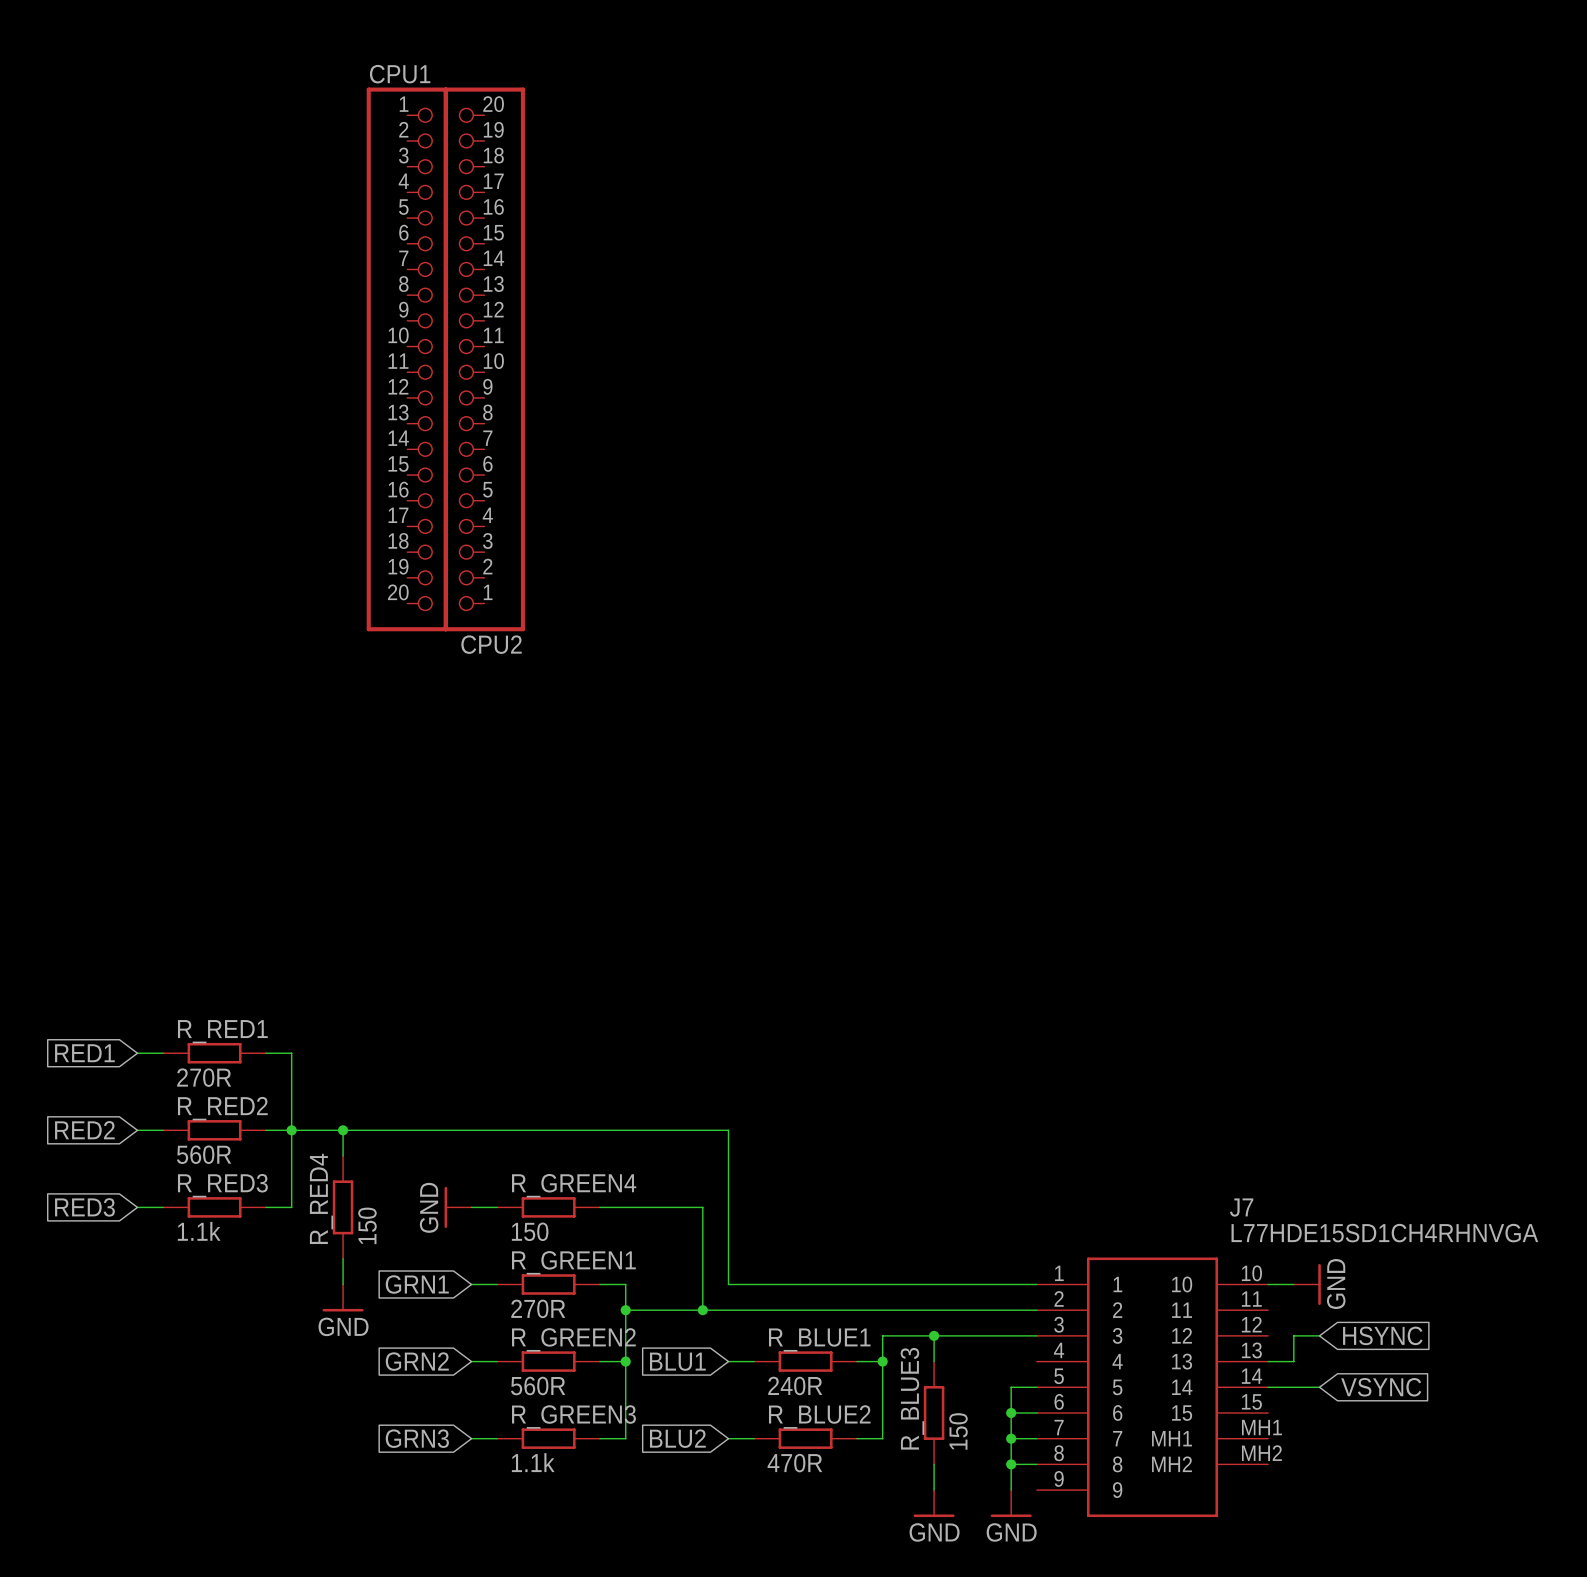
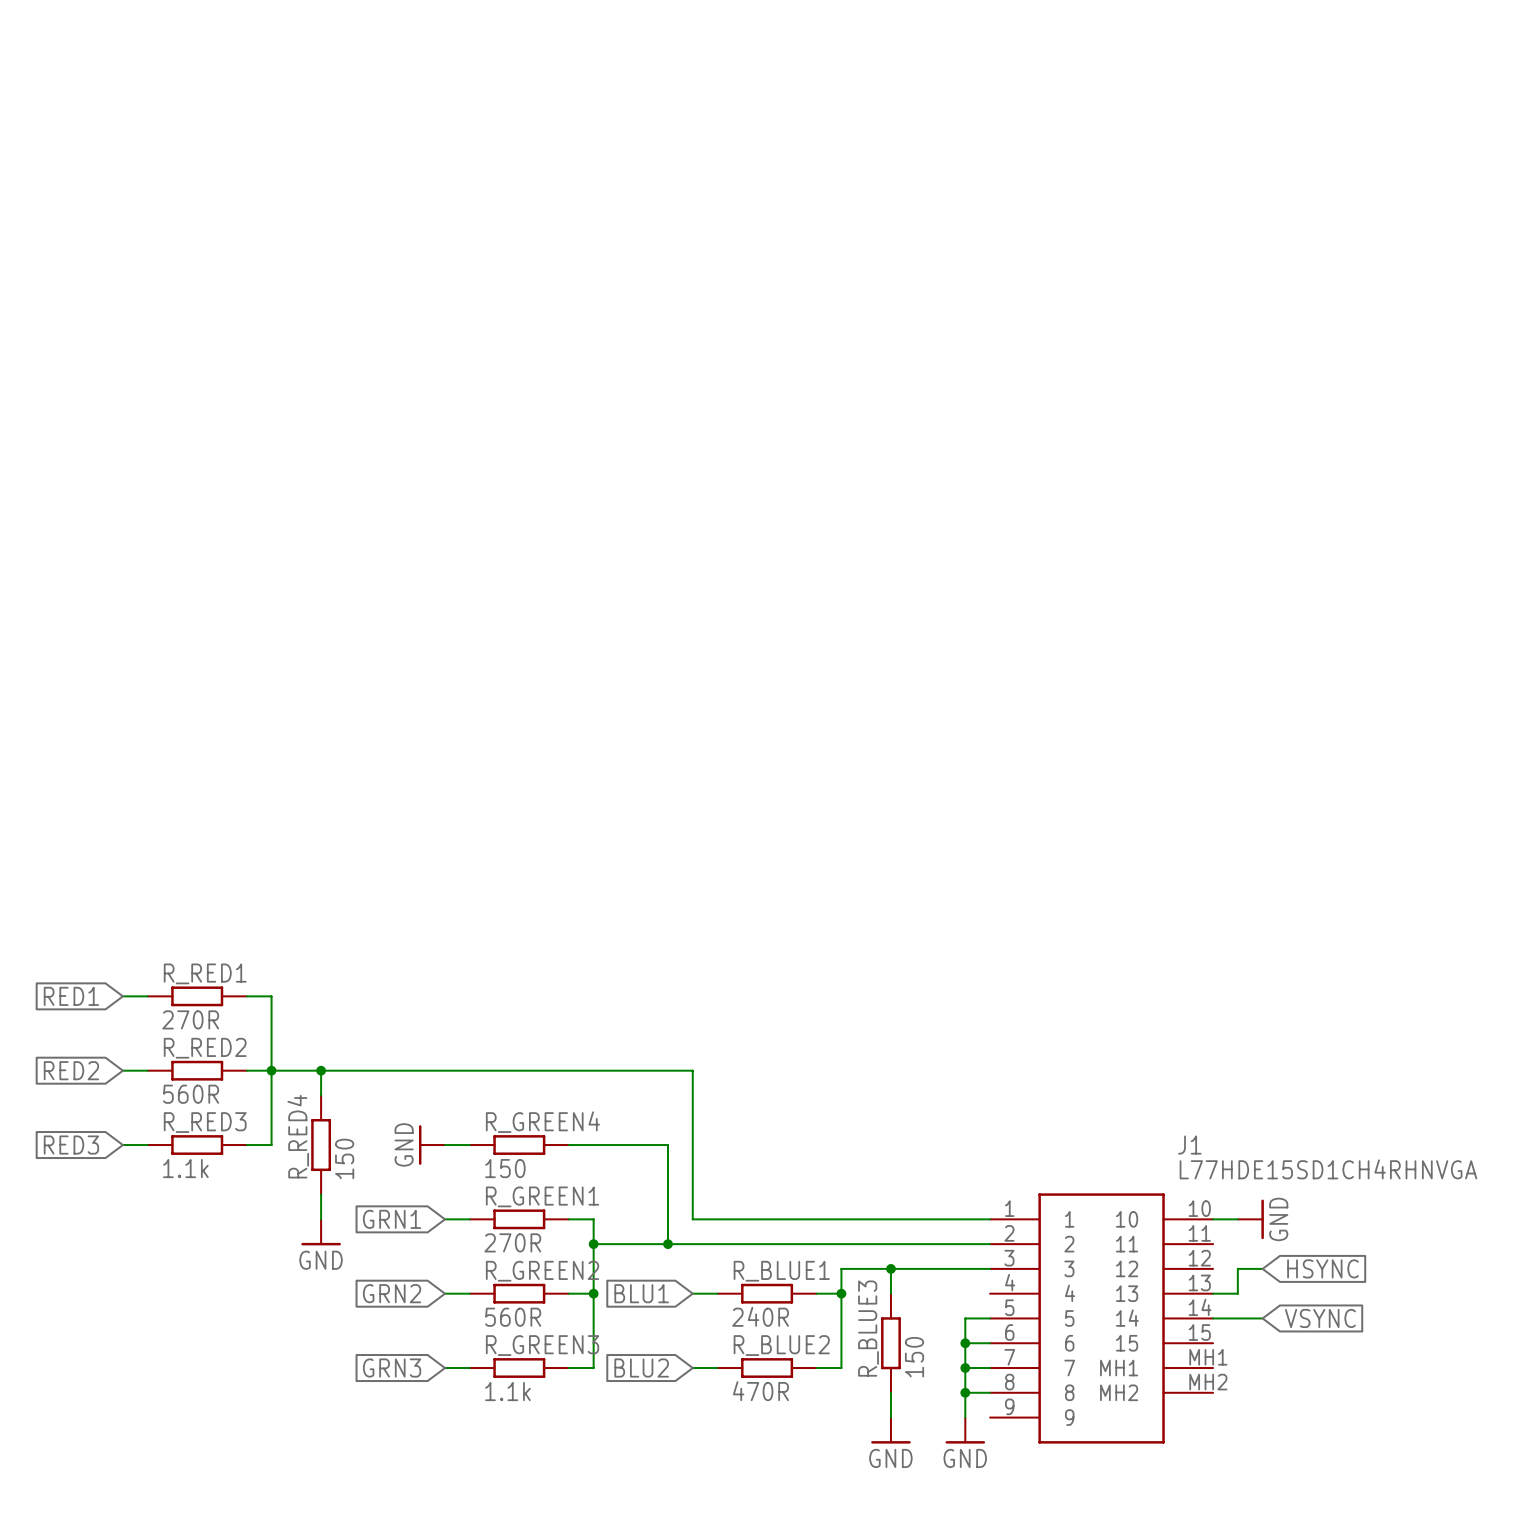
CPU1: (407, 359) -> none
CPU2: (484, 359) -> none
J7 name: J7 (1241, 1207) -> J1 (1189, 1145)

